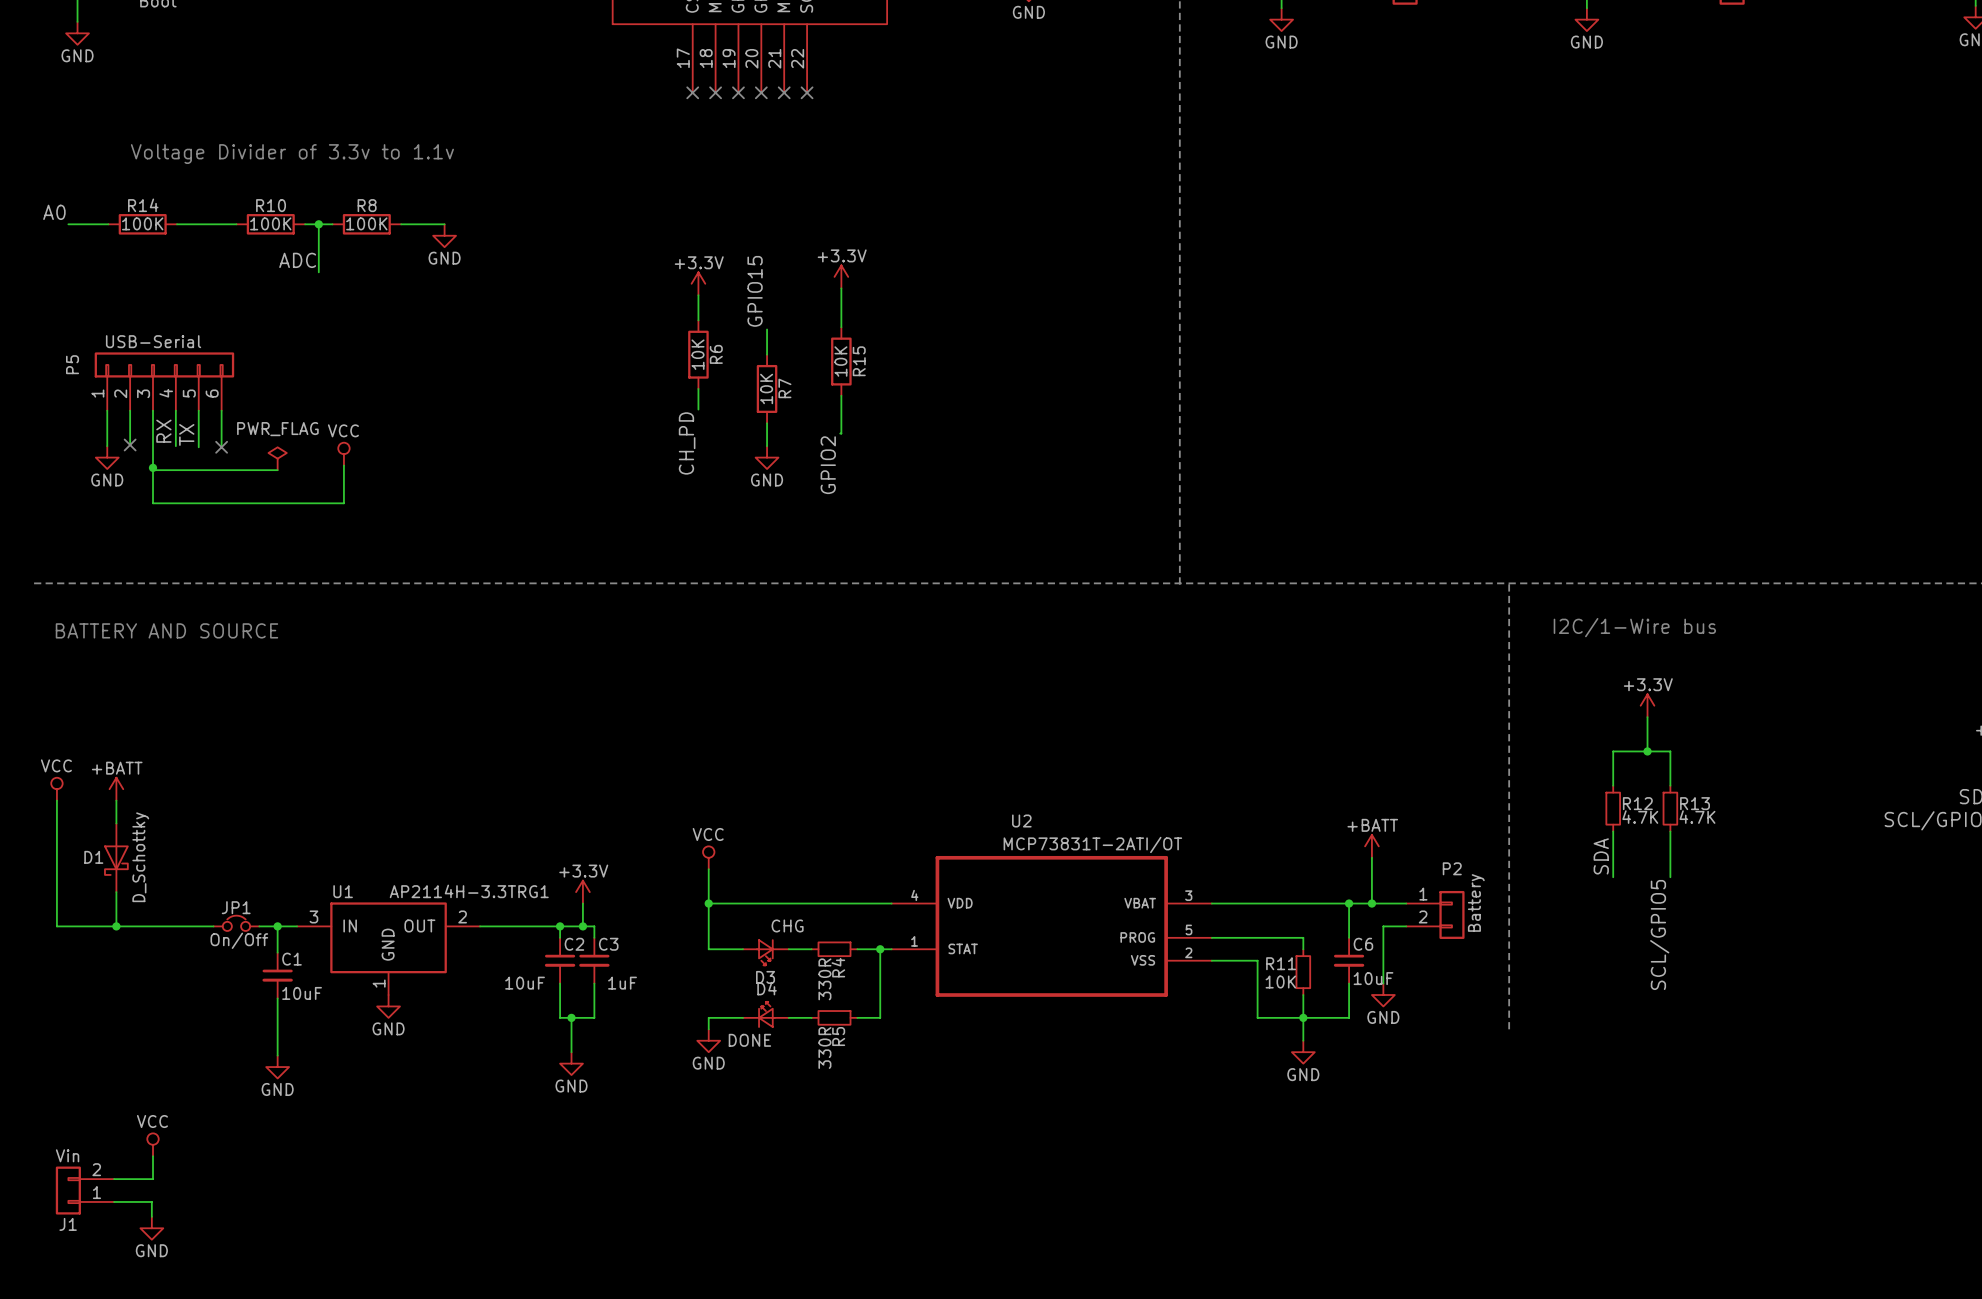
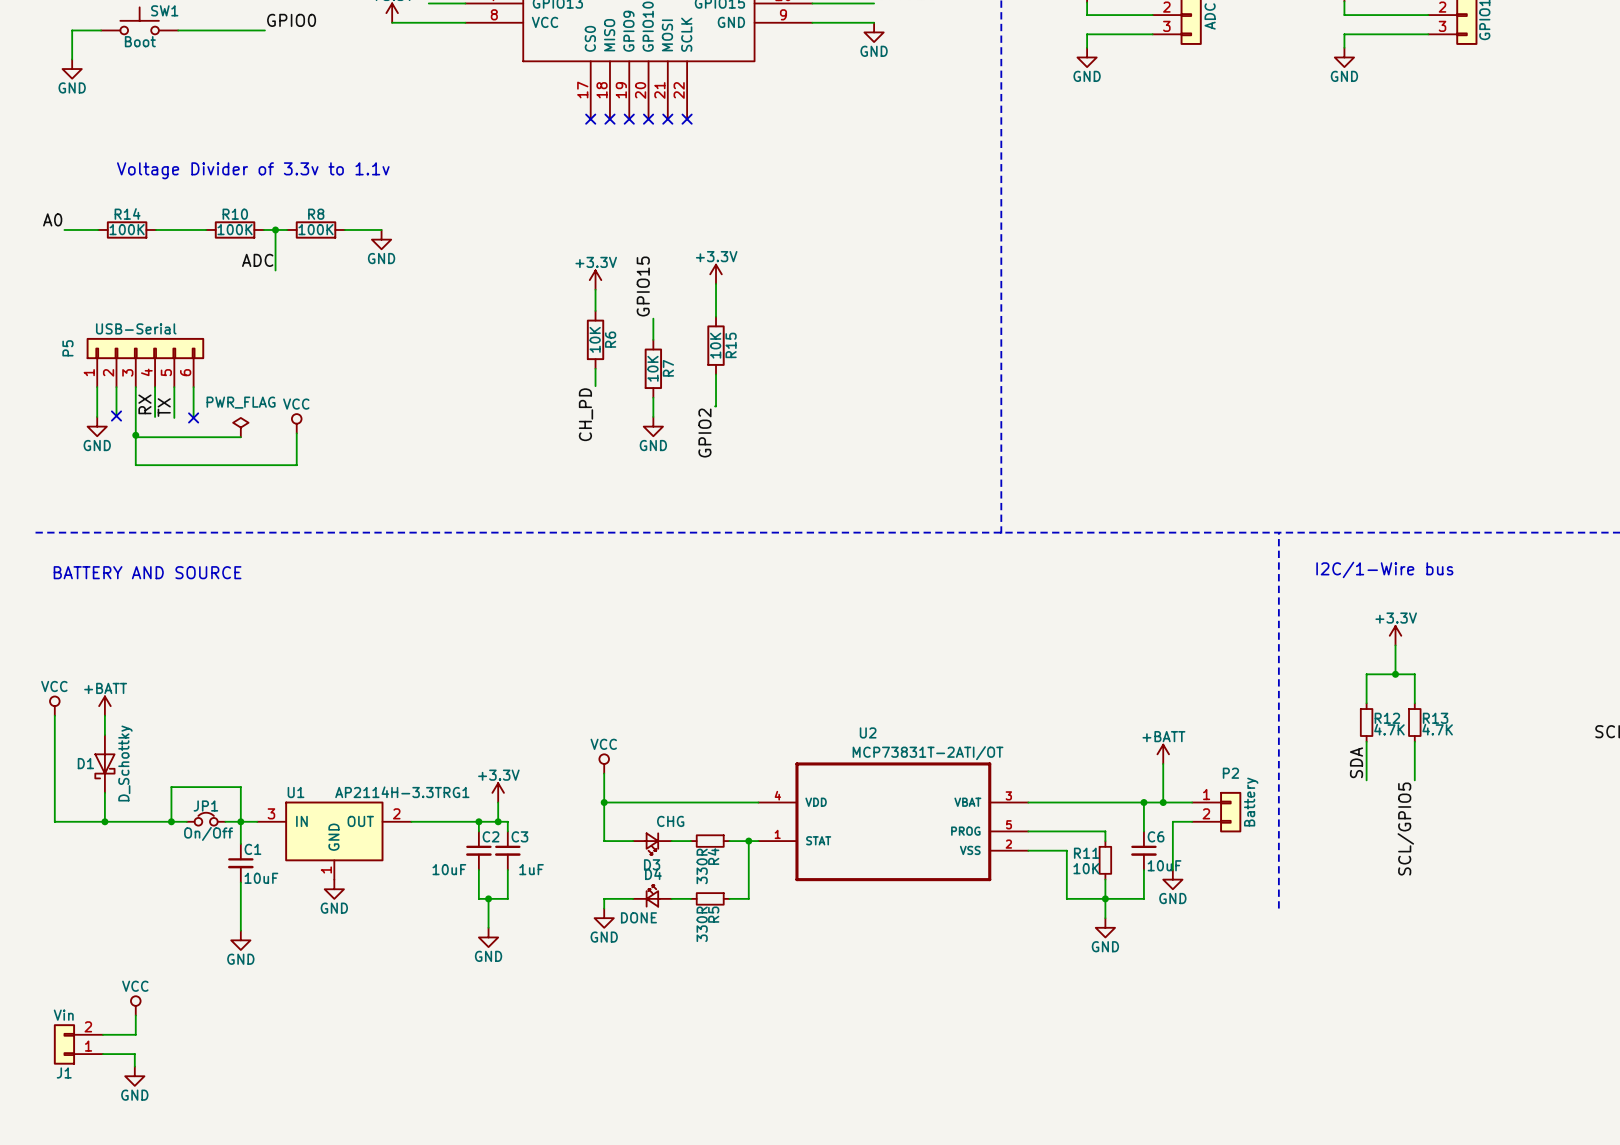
wire: none -> (171, 821) (171, 787) (240, 787) (240, 821)
junction: none -> (171, 821)

